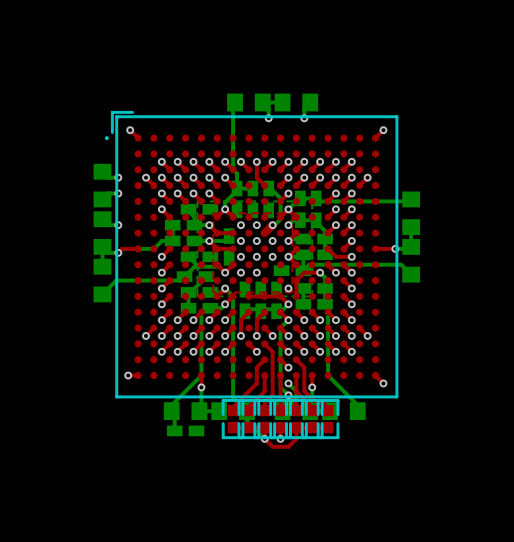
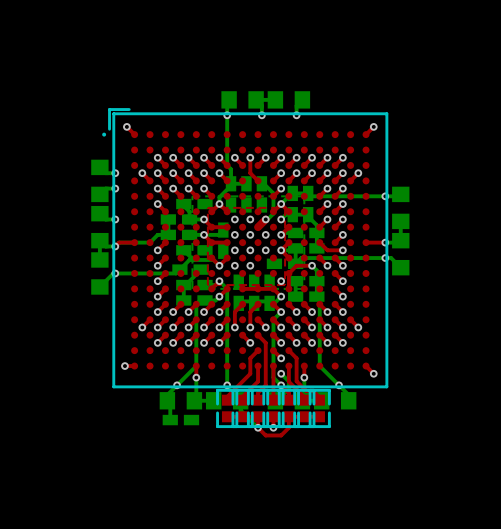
via: none -> (227, 115)
via: none -> (385, 196)
via: none -> (385, 258)
via: none -> (115, 273)
via: none -> (177, 385)
via: none -> (227, 385)
via: none -> (339, 385)

